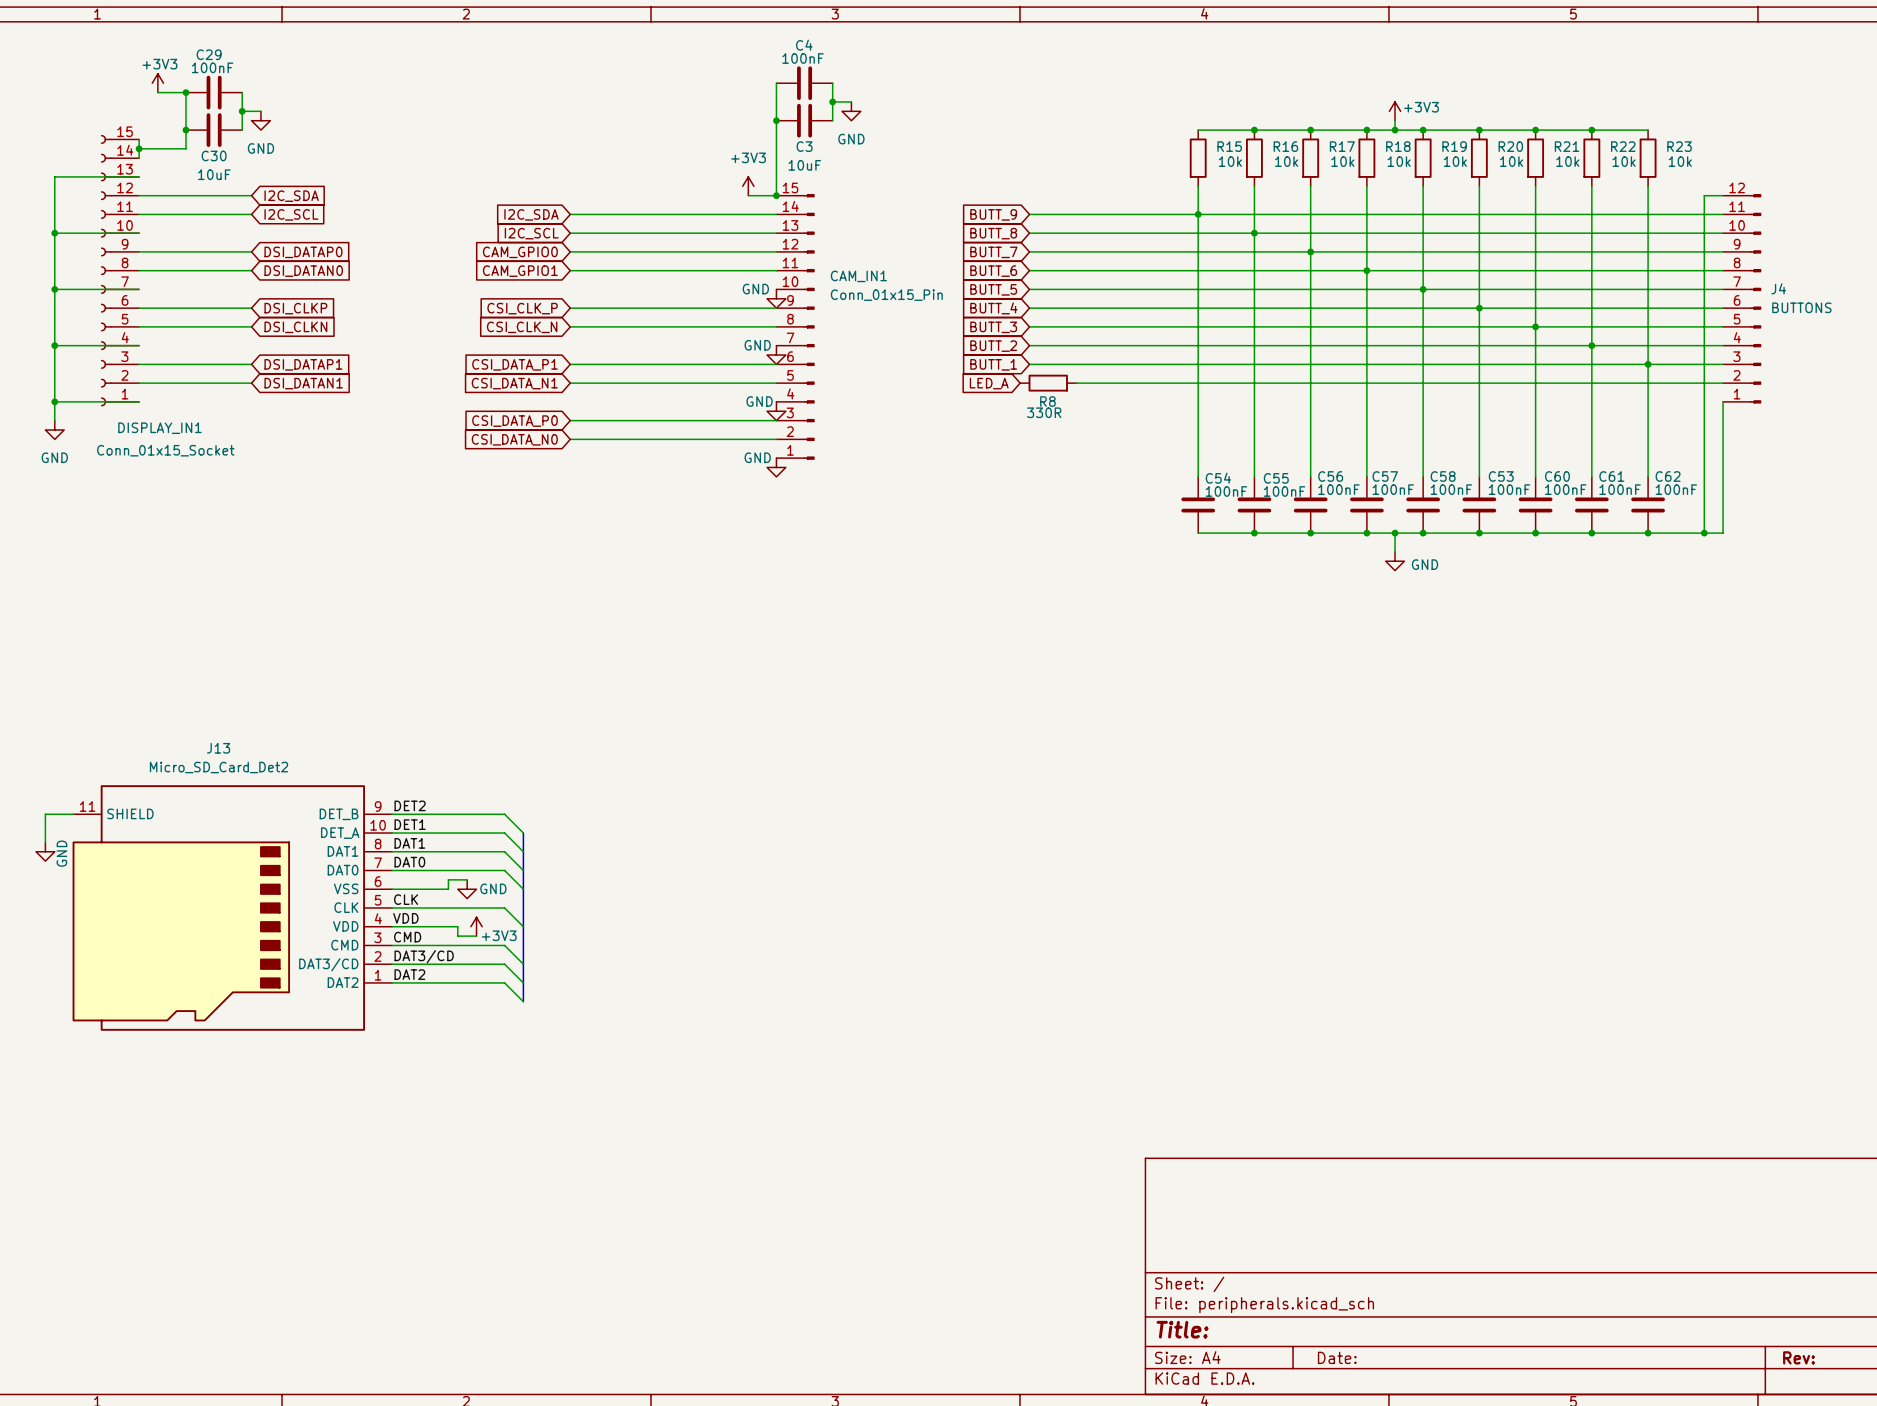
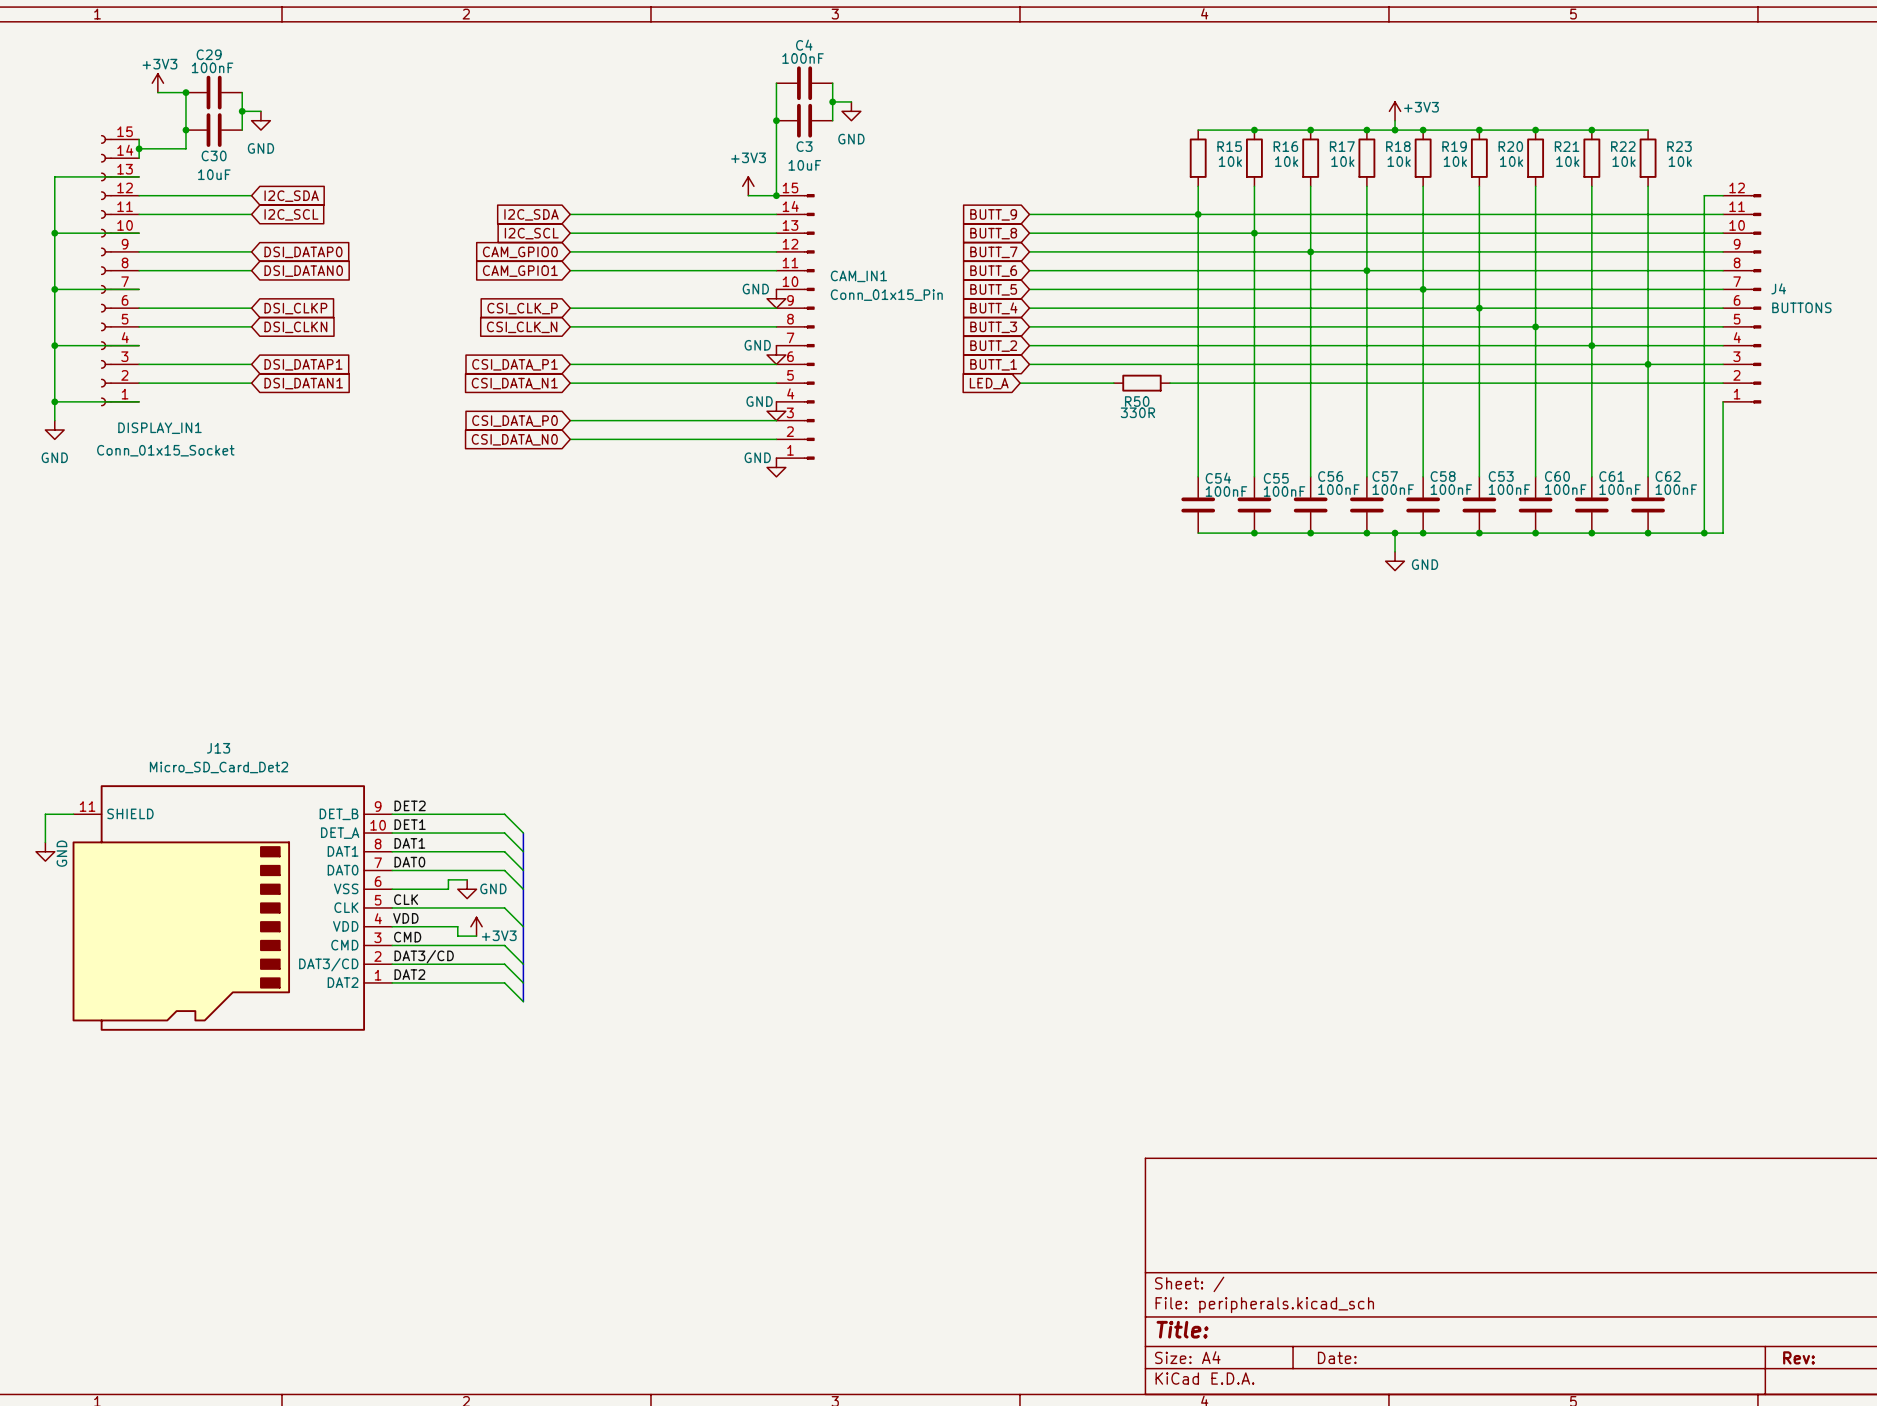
R8: 330R (1048, 383) -> none
wire: (1113, 383) (1170, 383) -> (1020, 383) (1076, 383)
R50: none -> 330R (1141, 383)

